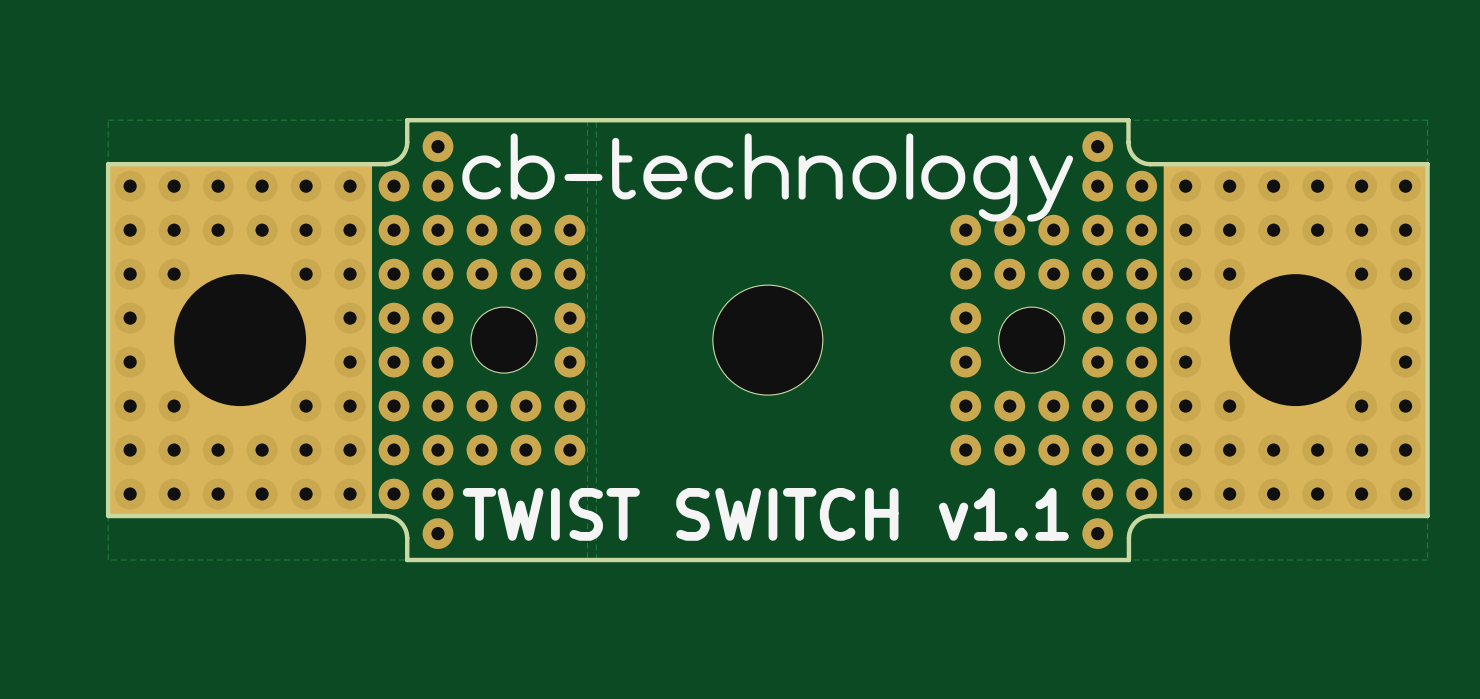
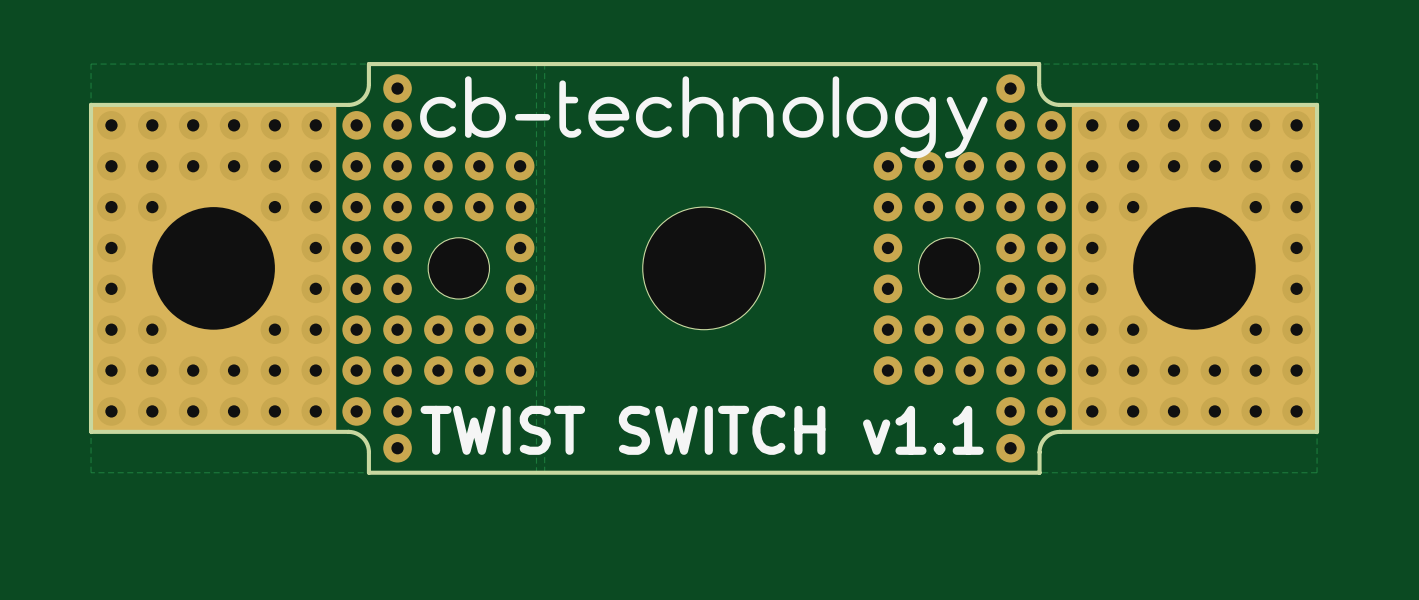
part footprint: [712, 285, 823, 396] -> [642, 207, 766, 330]

